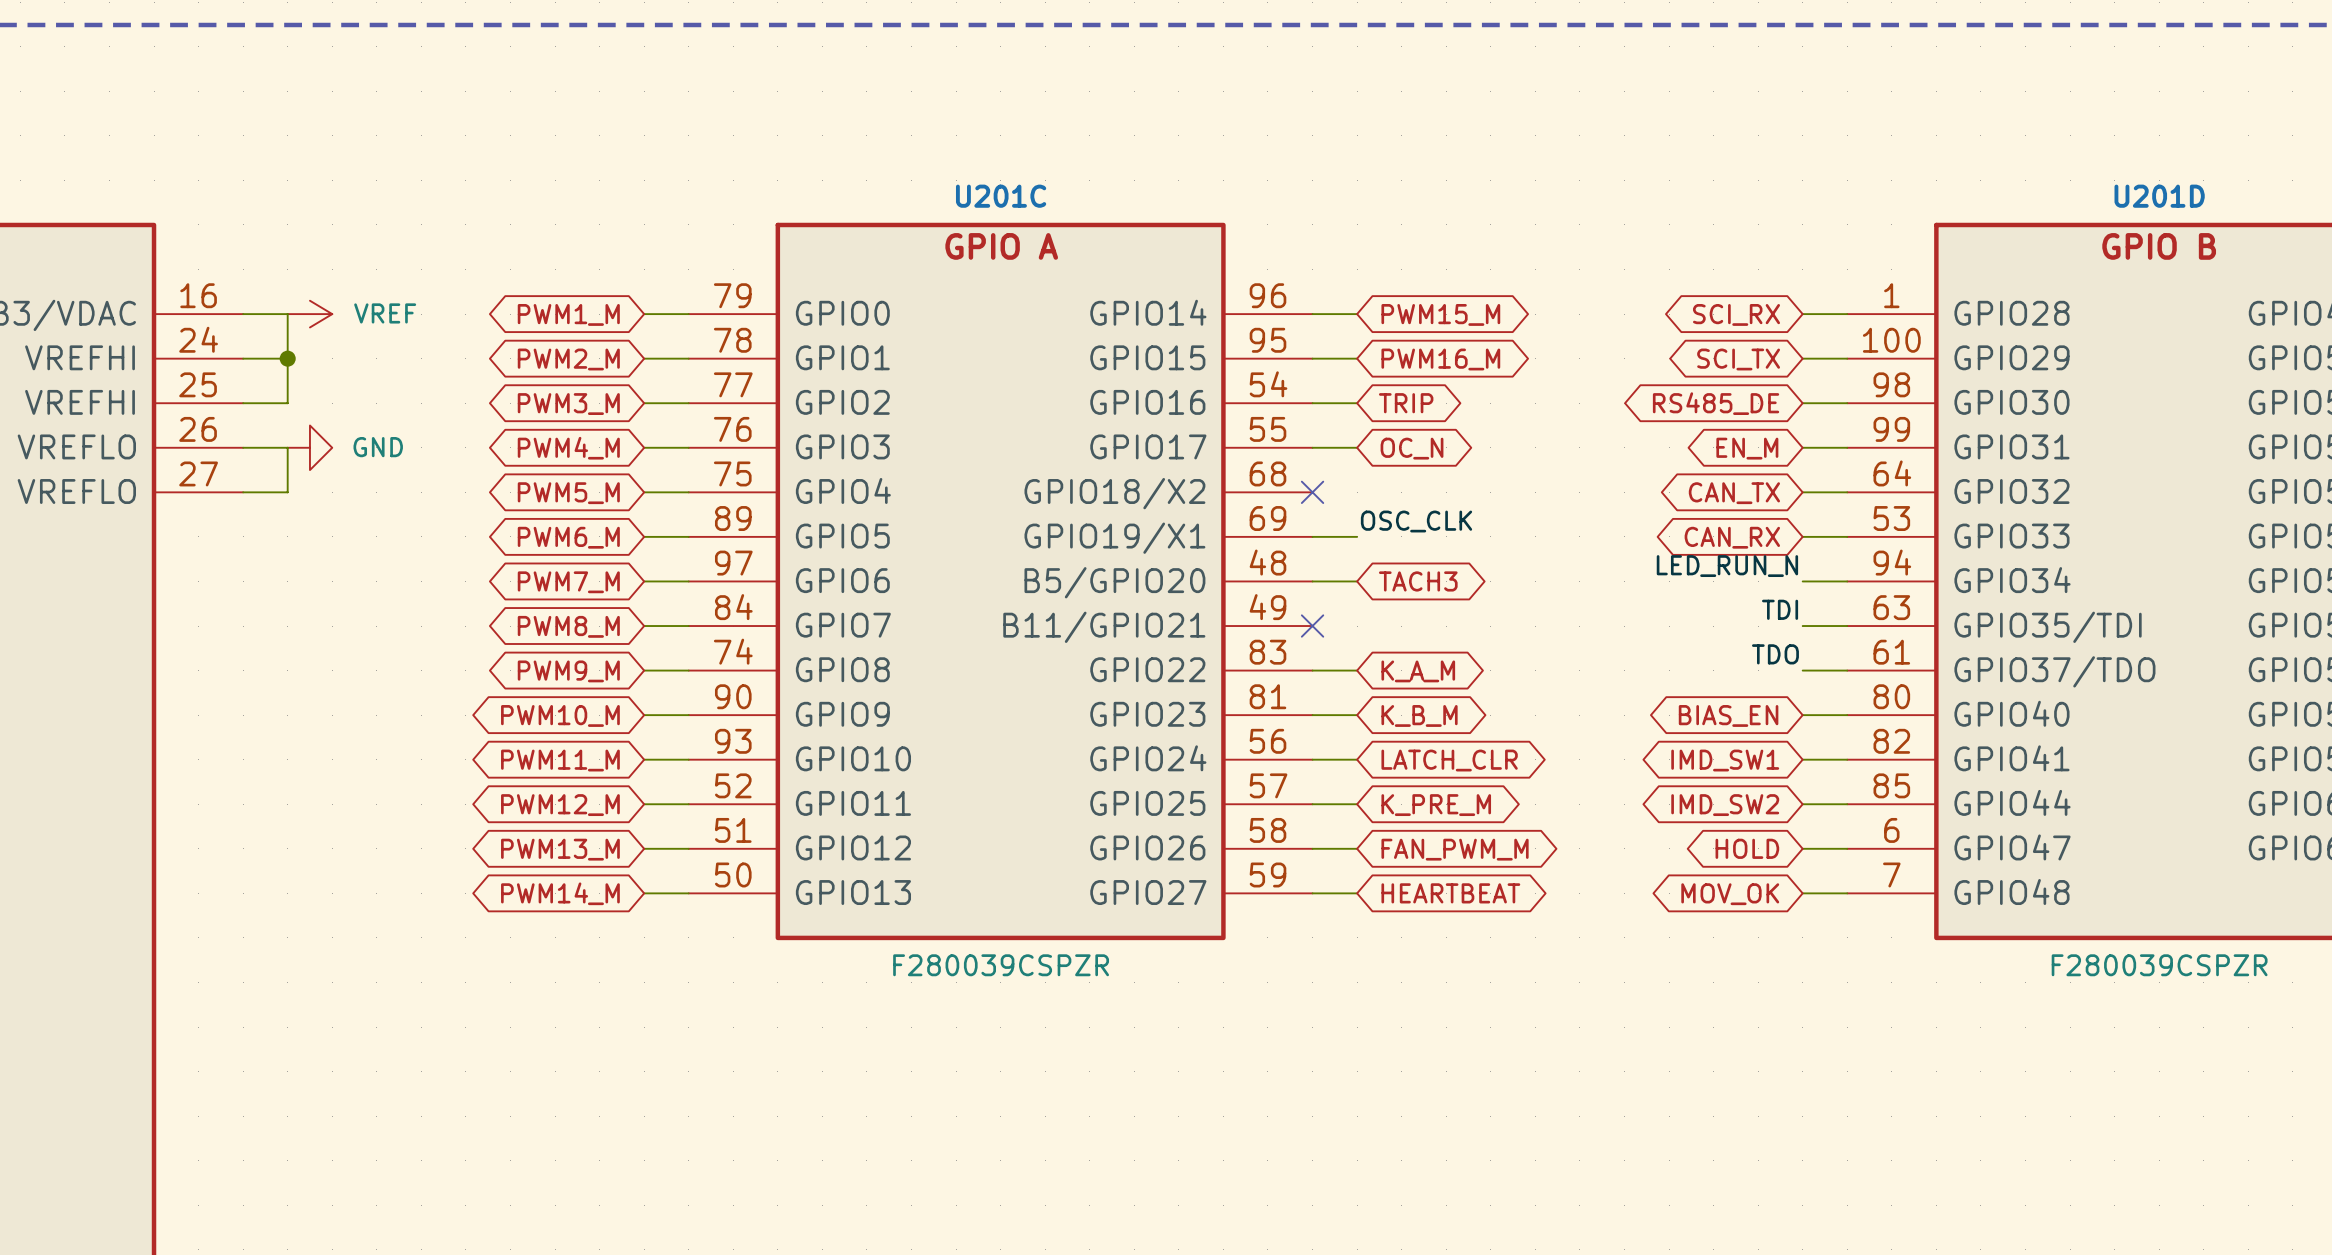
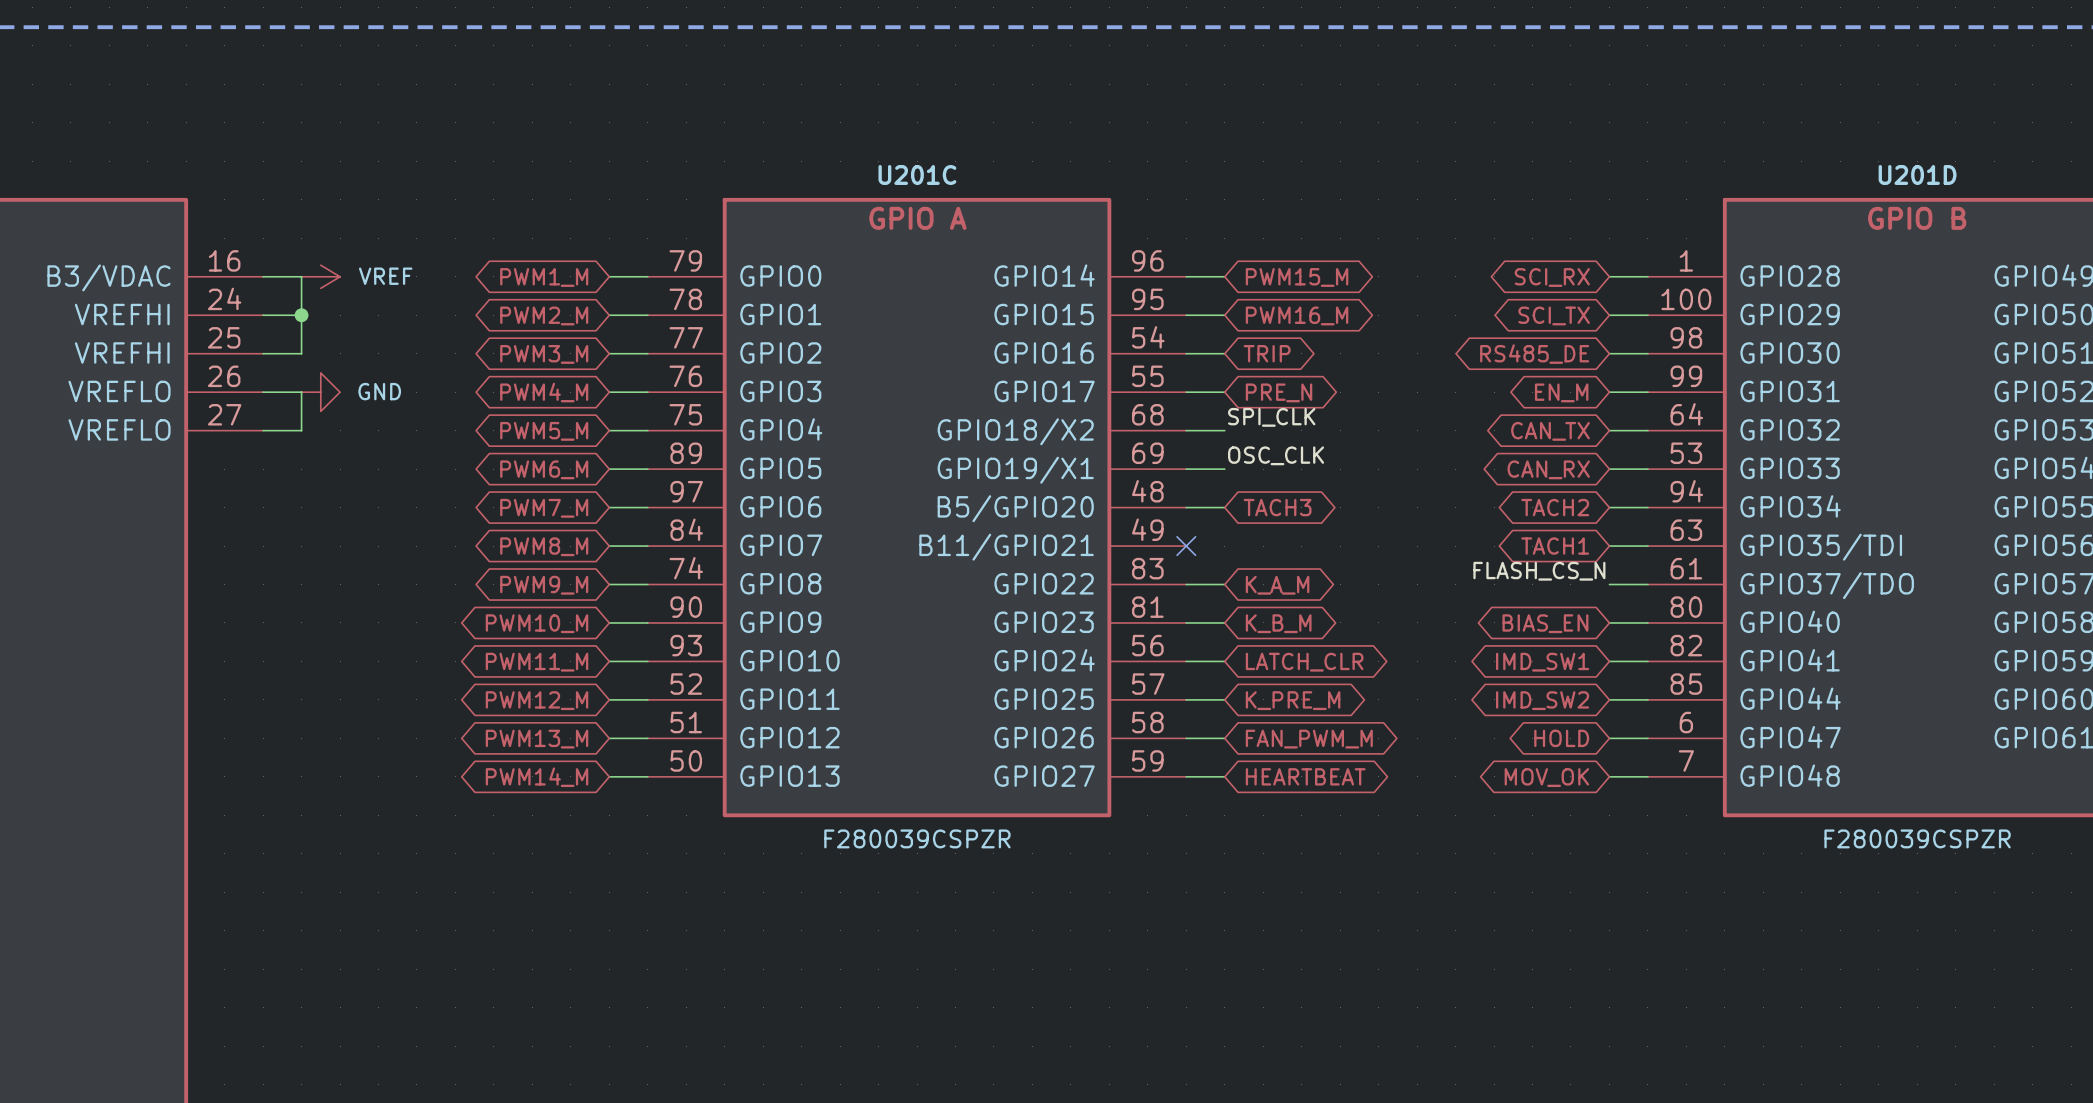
global label: OC_N (1412, 448) -> PRE_N (1279, 392)
label: none -> SPI_CLK (1271, 417)
wire: none -> (1186, 430) (1224, 430)
no-connect mark: (1312, 492) -> none
label: LED_RUN_N (1727, 566) -> none
global label: none -> TACH2 (1555, 507)
label: TDI (1780, 609) -> none
global label: none -> TACH1 (1555, 546)
label: TDO (1775, 654) -> FLASH_CS_N (1539, 571)

